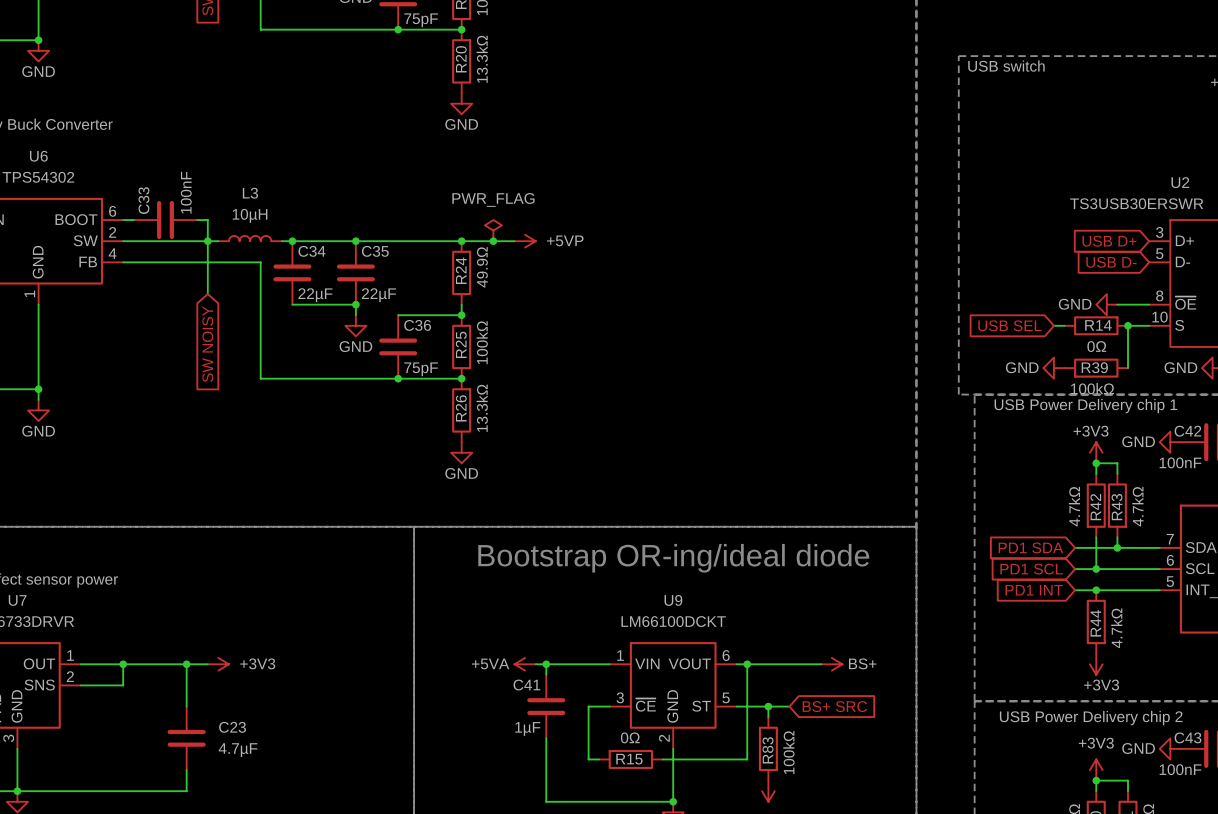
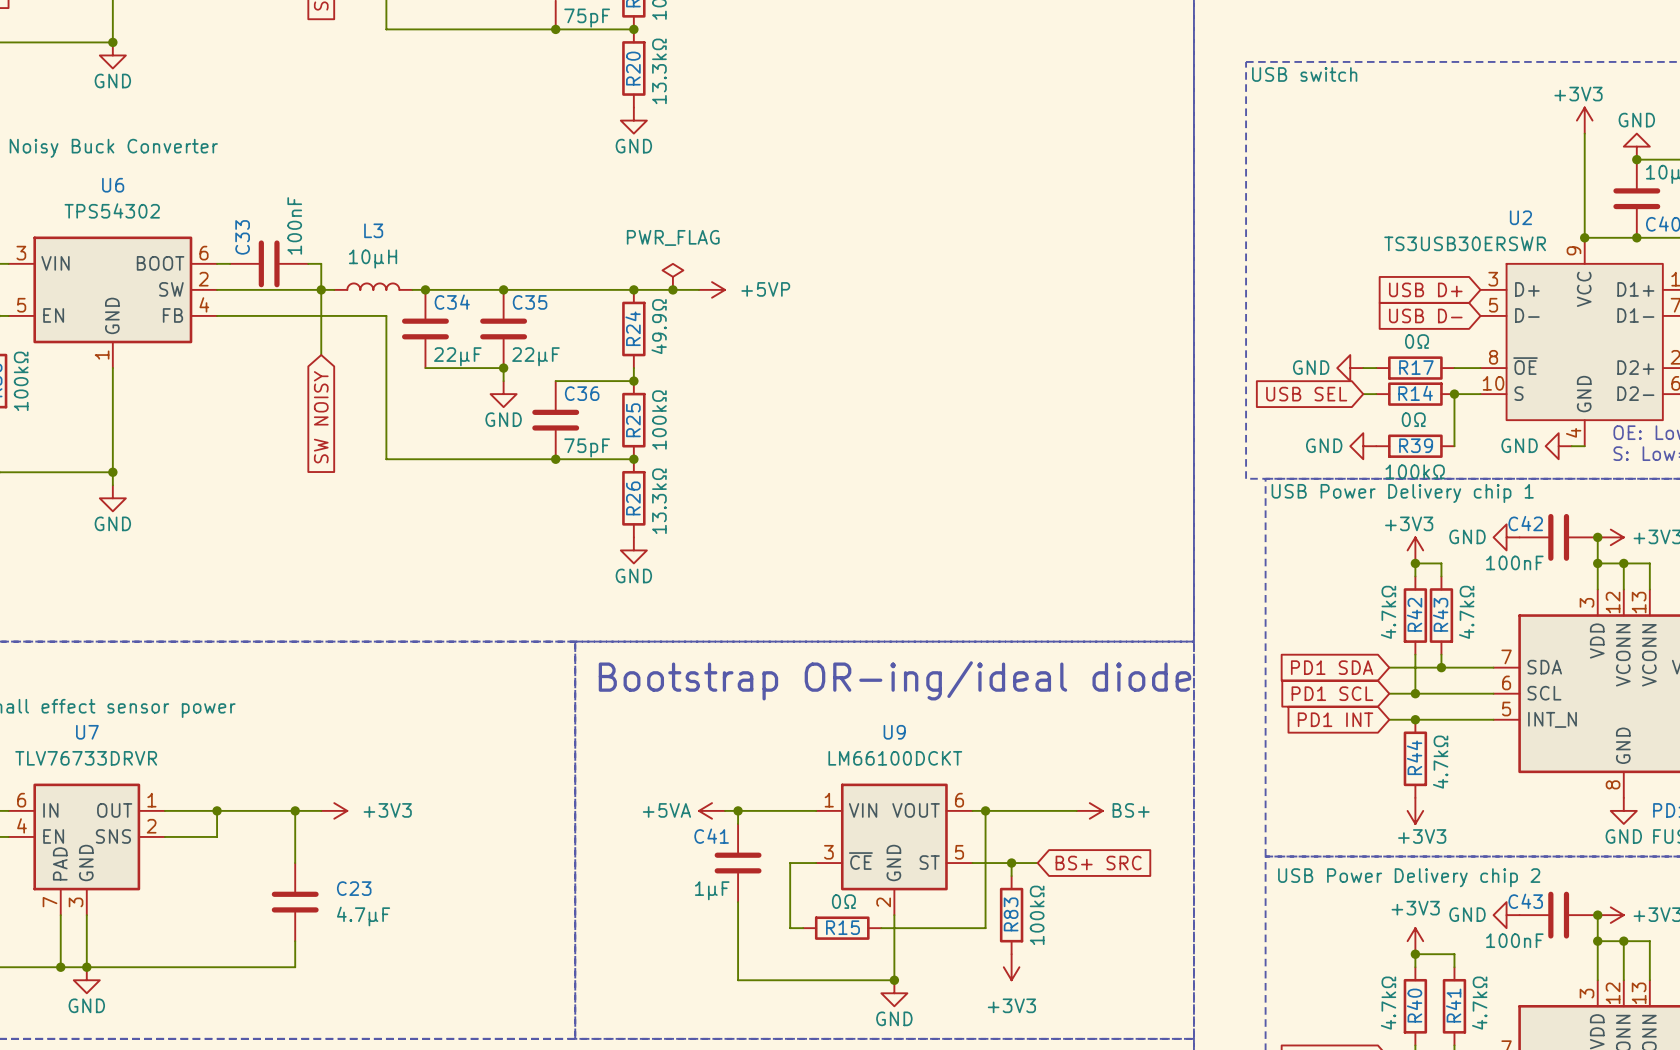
R17: none -> 0Ω (1415, 368)
power symbol position: GND (1106, 304) -> GND (1350, 368)

